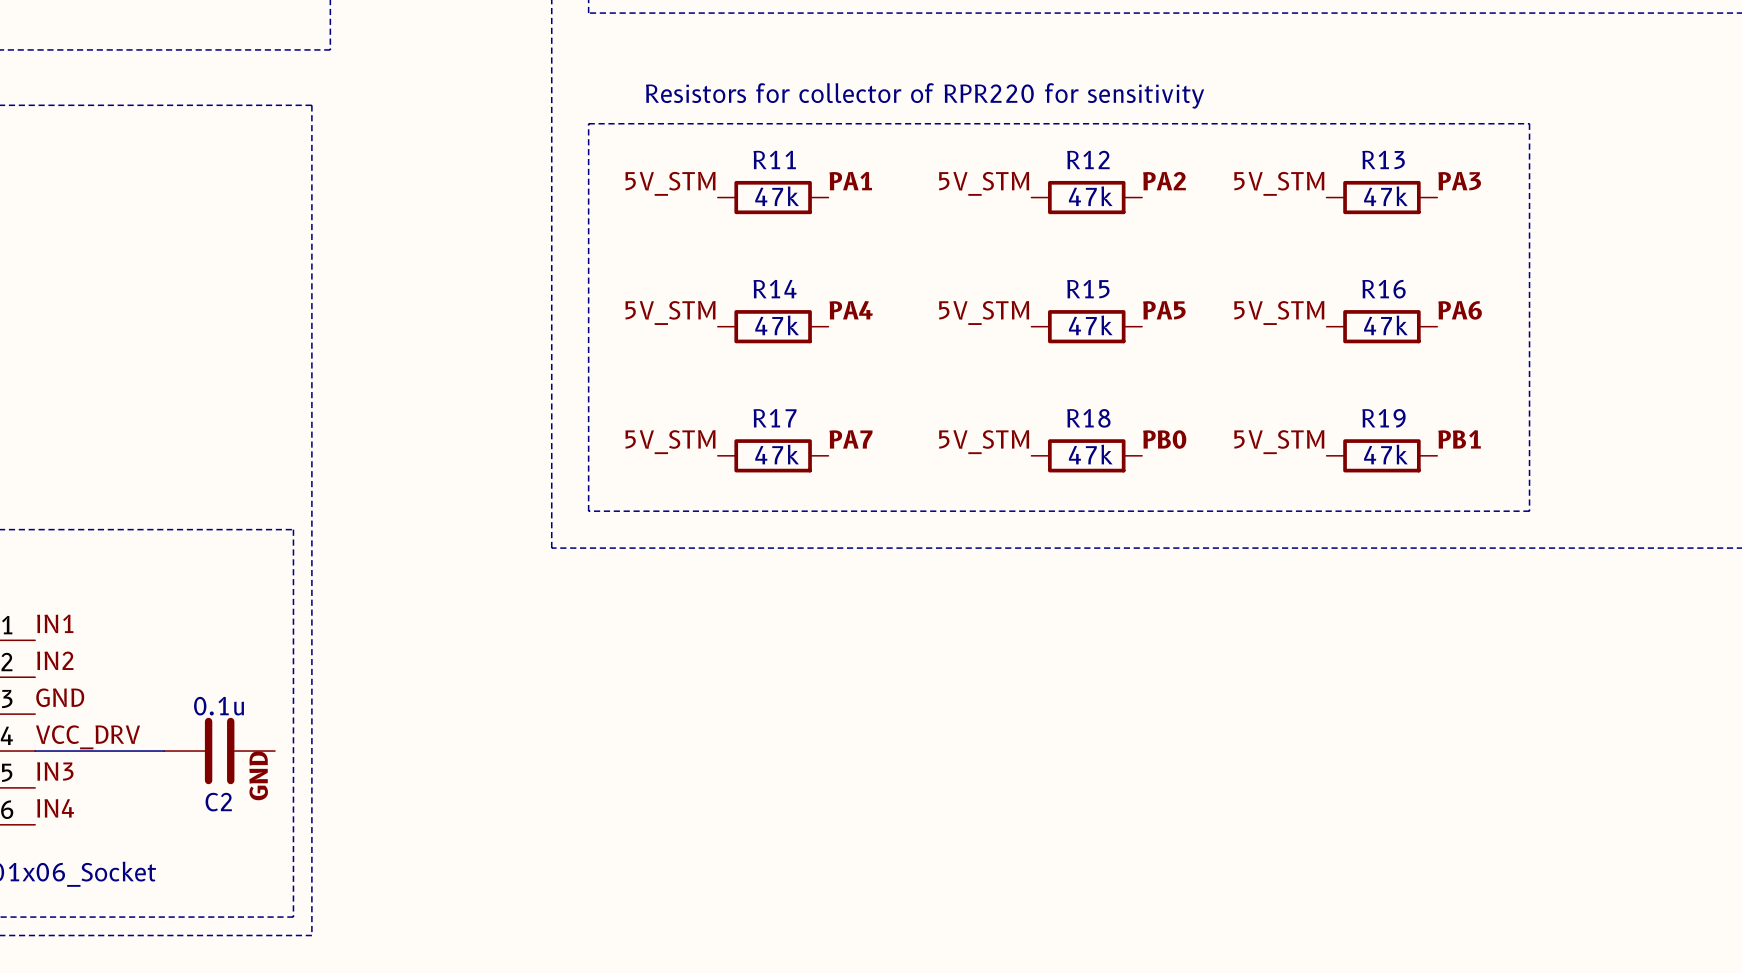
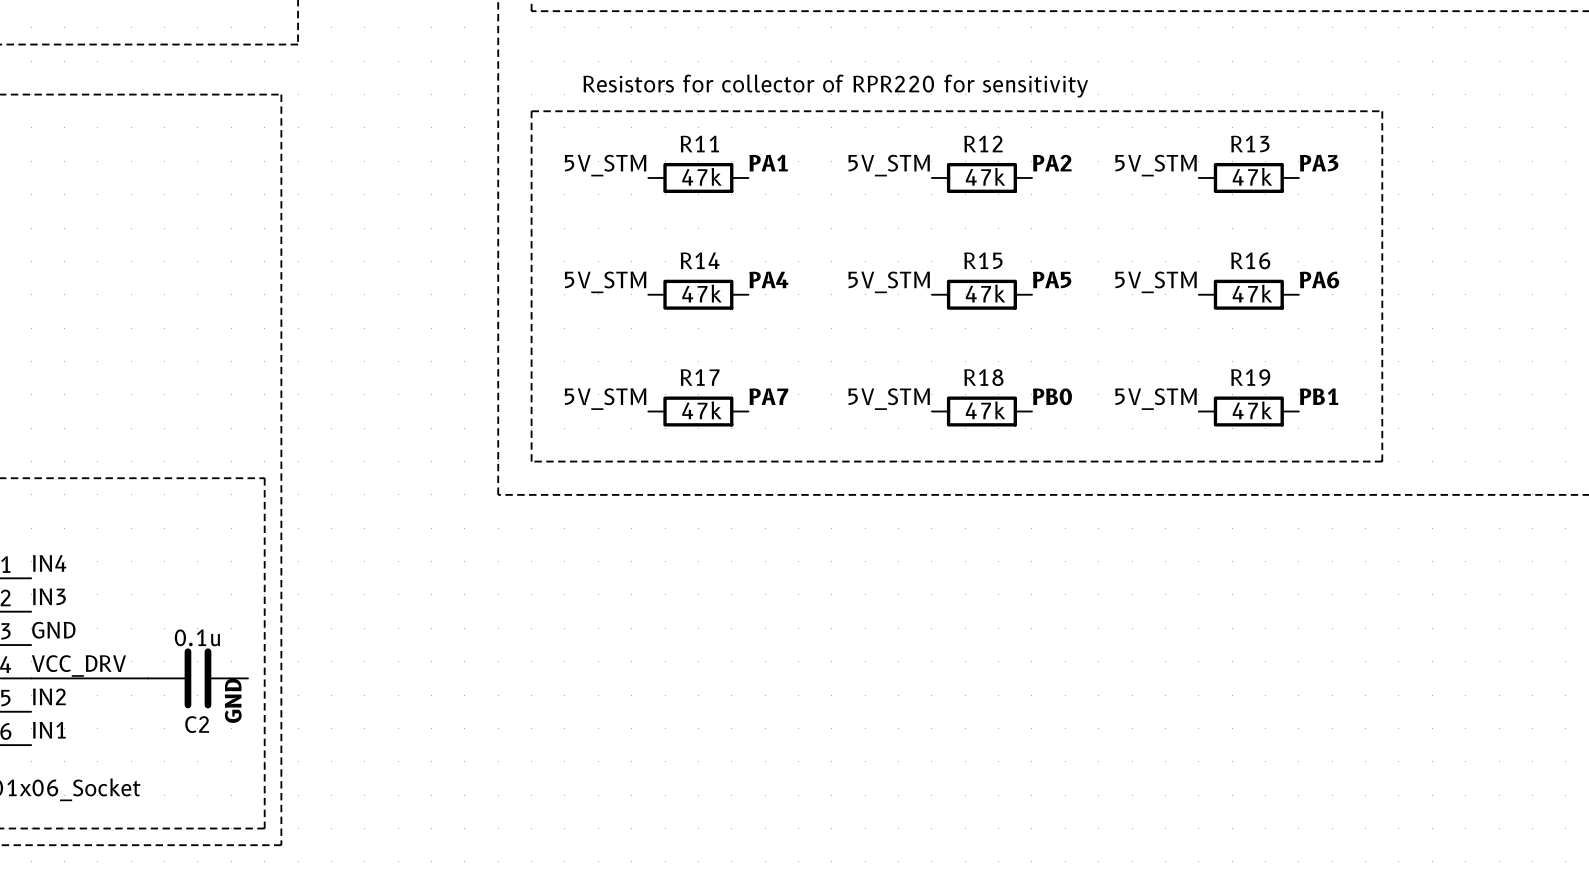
label: IN1 (55, 623) -> IN4 (49, 563)
label: IN2 (55, 660) -> IN3 (49, 596)
label: IN3 (55, 771) -> IN2 (49, 696)
label: IN4 (55, 808) -> IN1 (49, 730)

